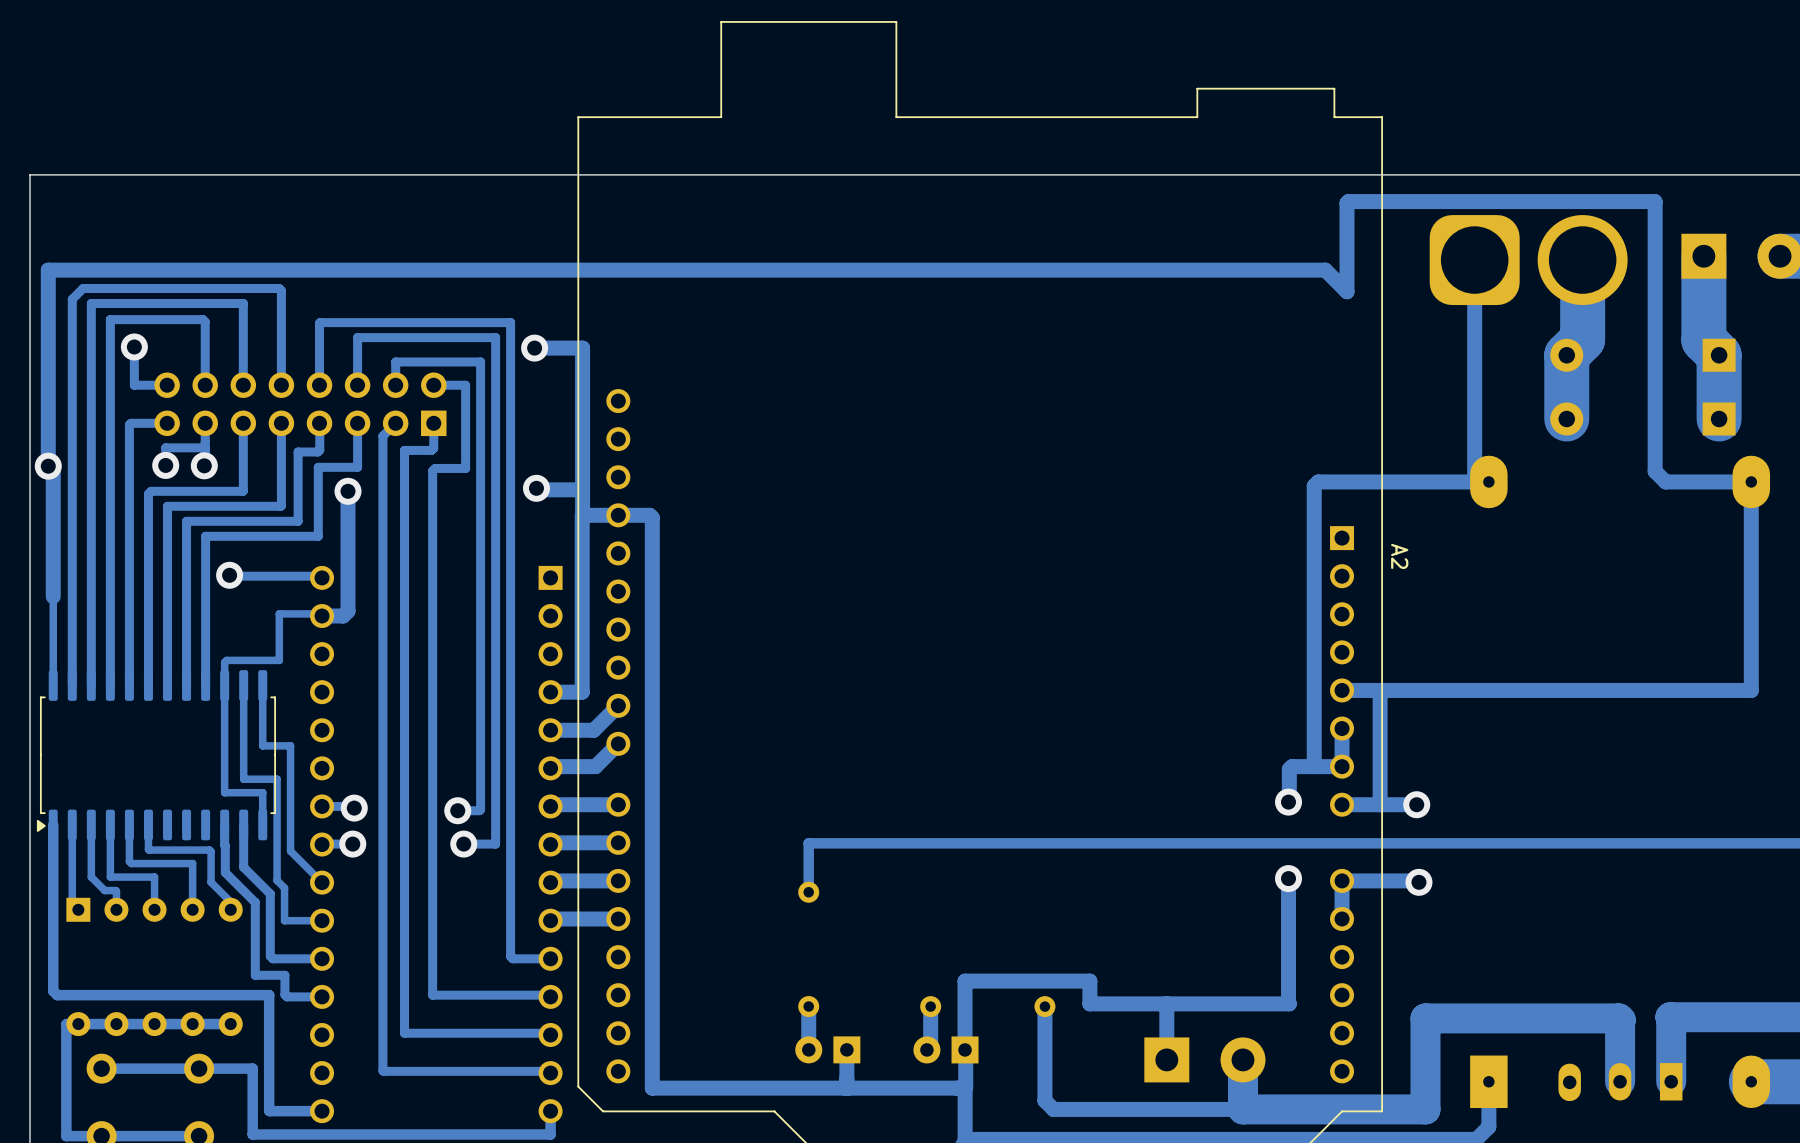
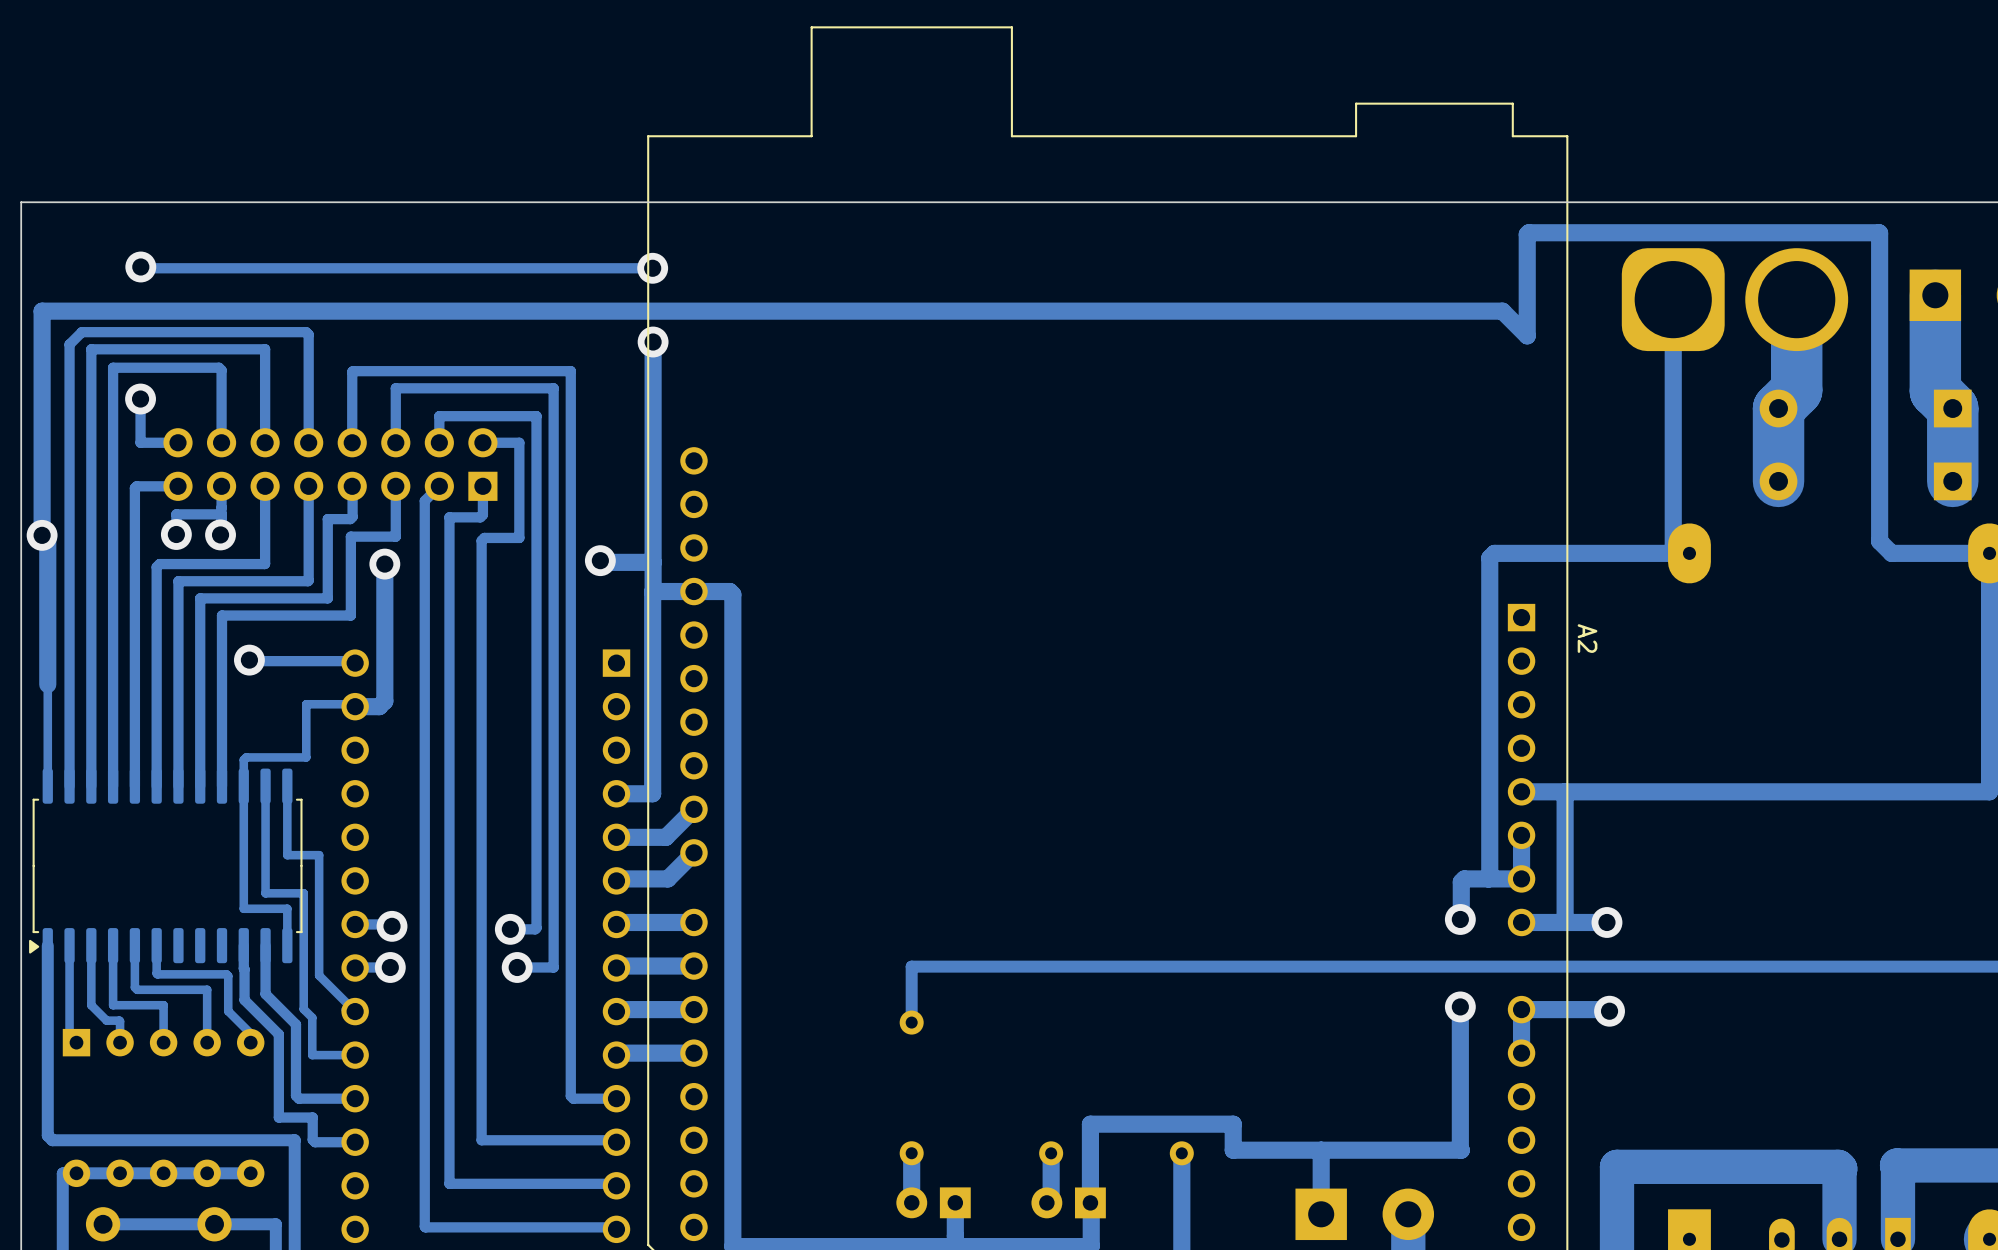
track: none -> (140, 266) (652, 268)
via: none -> (140, 266)
via: none -> (652, 268)
via: none -> (653, 342)
via: (534, 348) -> none
track: (582, 348) (534, 348) -> (653, 400) (653, 342)

